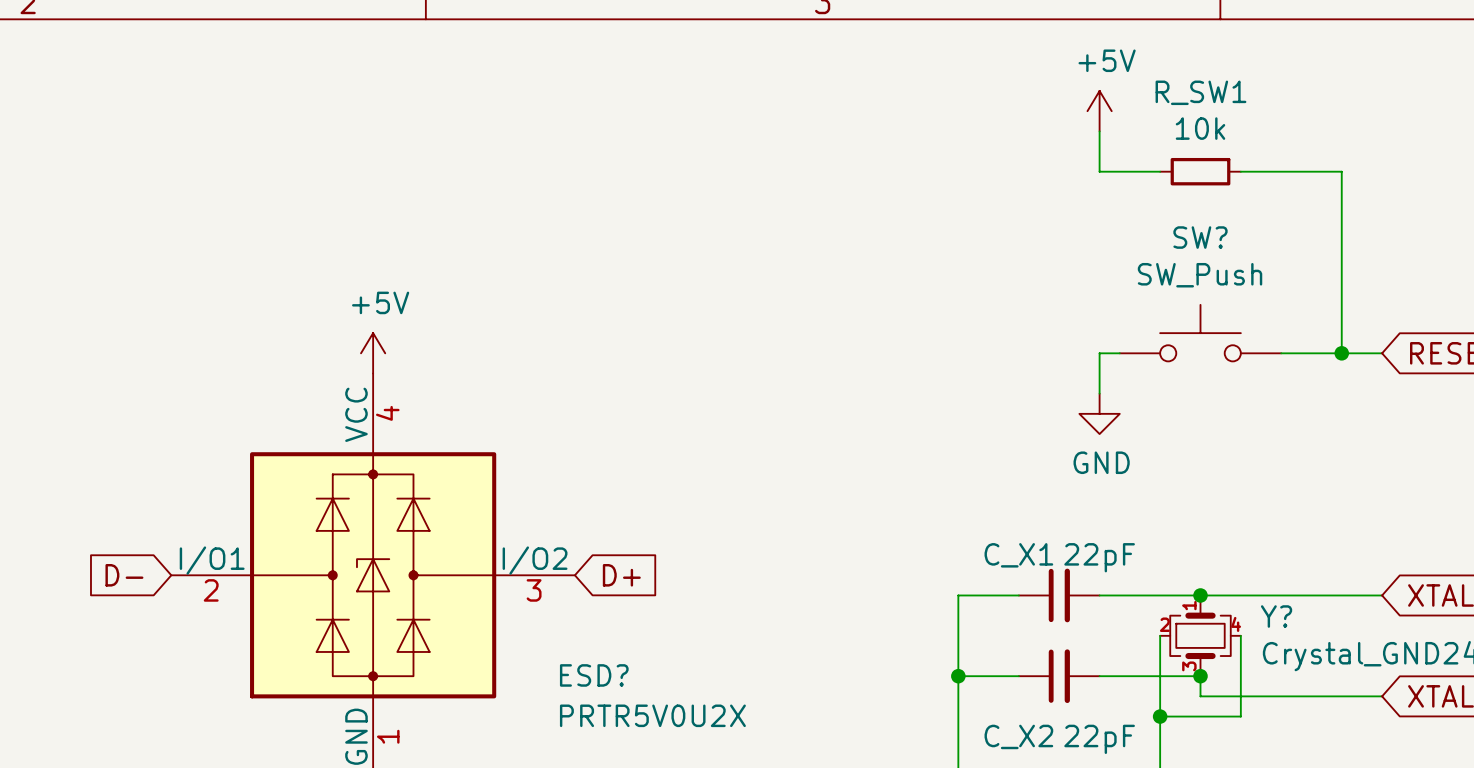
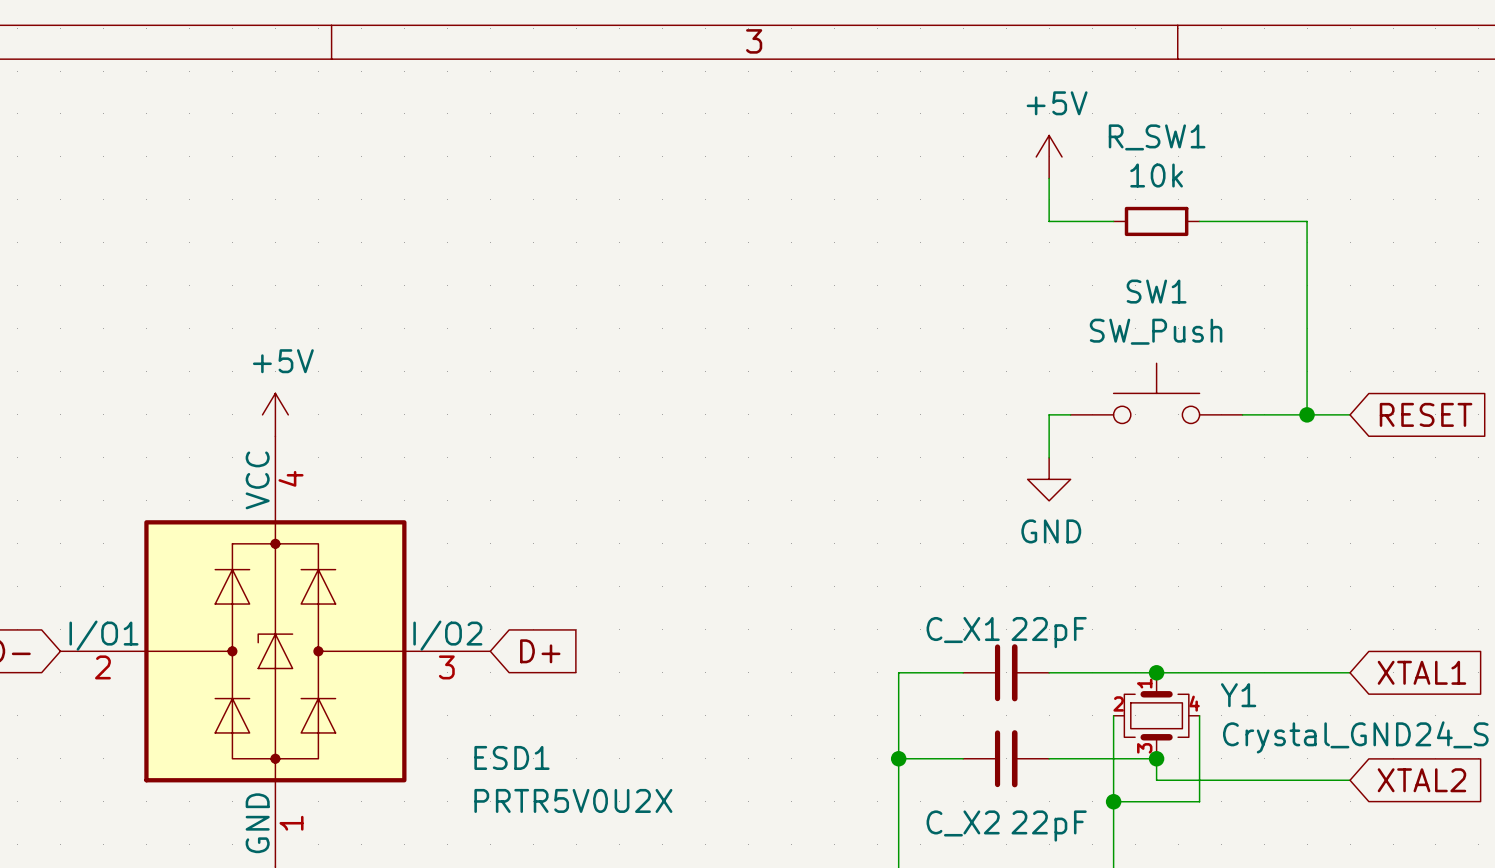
SW? name: SW? (1200, 237) -> SW1 (1156, 291)
Y? name: Y? (1276, 616) -> Y1 (1238, 695)
ESD? name: ESD? (594, 675) -> ESD1 (511, 757)

